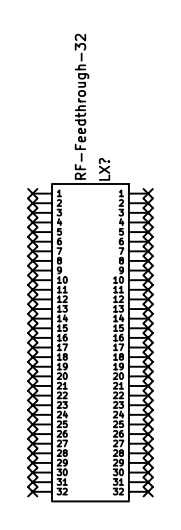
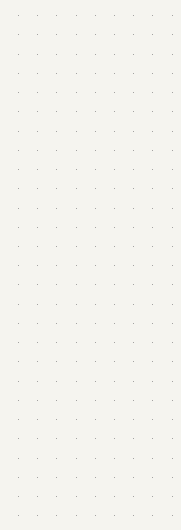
no-connect mark: (32, 193) -> none
no-connect mark: (148, 193) -> none
no-connect mark: (32, 203) -> none
no-connect mark: (148, 203) -> none
no-connect mark: (32, 212) -> none
no-connect mark: (148, 212) -> none
no-connect mark: (32, 222) -> none
no-connect mark: (148, 222) -> none
no-connect mark: (32, 232) -> none
no-connect mark: (148, 232) -> none
no-connect mark: (32, 241) -> none
no-connect mark: (148, 241) -> none
no-connect mark: (32, 251) -> none
no-connect mark: (148, 251) -> none
no-connect mark: (32, 260) -> none
no-connect mark: (148, 260) -> none
no-connect mark: (32, 270) -> none
no-connect mark: (148, 270) -> none
no-connect mark: (32, 280) -> none
no-connect mark: (148, 280) -> none
no-connect mark: (32, 289) -> none
no-connect mark: (148, 289) -> none
no-connect mark: (32, 299) -> none
no-connect mark: (148, 299) -> none
no-connect mark: (32, 309) -> none
no-connect mark: (148, 309) -> none
no-connect mark: (32, 318) -> none
no-connect mark: (148, 318) -> none
no-connect mark: (32, 328) -> none
no-connect mark: (148, 328) -> none
no-connect mark: (32, 337) -> none
no-connect mark: (148, 337) -> none
LX?: RF-Feedthrough-32 (90, 342) -> none
no-connect mark: (32, 347) -> none
no-connect mark: (148, 347) -> none
no-connect mark: (32, 357) -> none
no-connect mark: (148, 357) -> none
no-connect mark: (32, 366) -> none
no-connect mark: (148, 366) -> none
no-connect mark: (32, 376) -> none
no-connect mark: (148, 376) -> none
no-connect mark: (32, 385) -> none
no-connect mark: (148, 385) -> none
no-connect mark: (32, 395) -> none
no-connect mark: (148, 395) -> none
no-connect mark: (32, 405) -> none
no-connect mark: (148, 405) -> none
no-connect mark: (32, 414) -> none
no-connect mark: (148, 414) -> none
no-connect mark: (32, 424) -> none
no-connect mark: (148, 424) -> none
no-connect mark: (32, 434) -> none
no-connect mark: (148, 434) -> none
no-connect mark: (32, 443) -> none
no-connect mark: (148, 443) -> none
no-connect mark: (32, 453) -> none
no-connect mark: (148, 453) -> none
no-connect mark: (32, 462) -> none
no-connect mark: (148, 462) -> none
no-connect mark: (32, 472) -> none
no-connect mark: (148, 472) -> none
no-connect mark: (32, 482) -> none
no-connect mark: (148, 482) -> none
no-connect mark: (32, 491) -> none
no-connect mark: (148, 491) -> none

